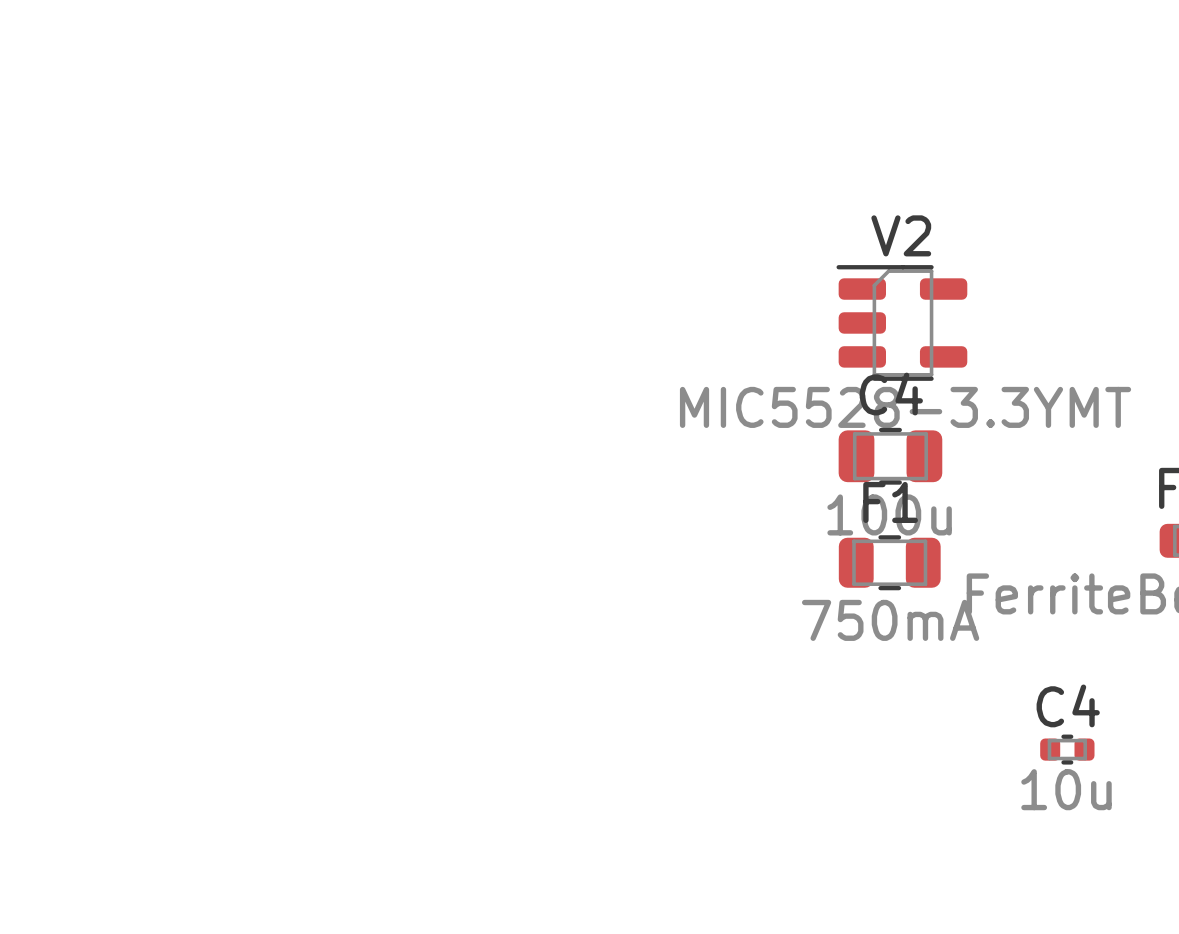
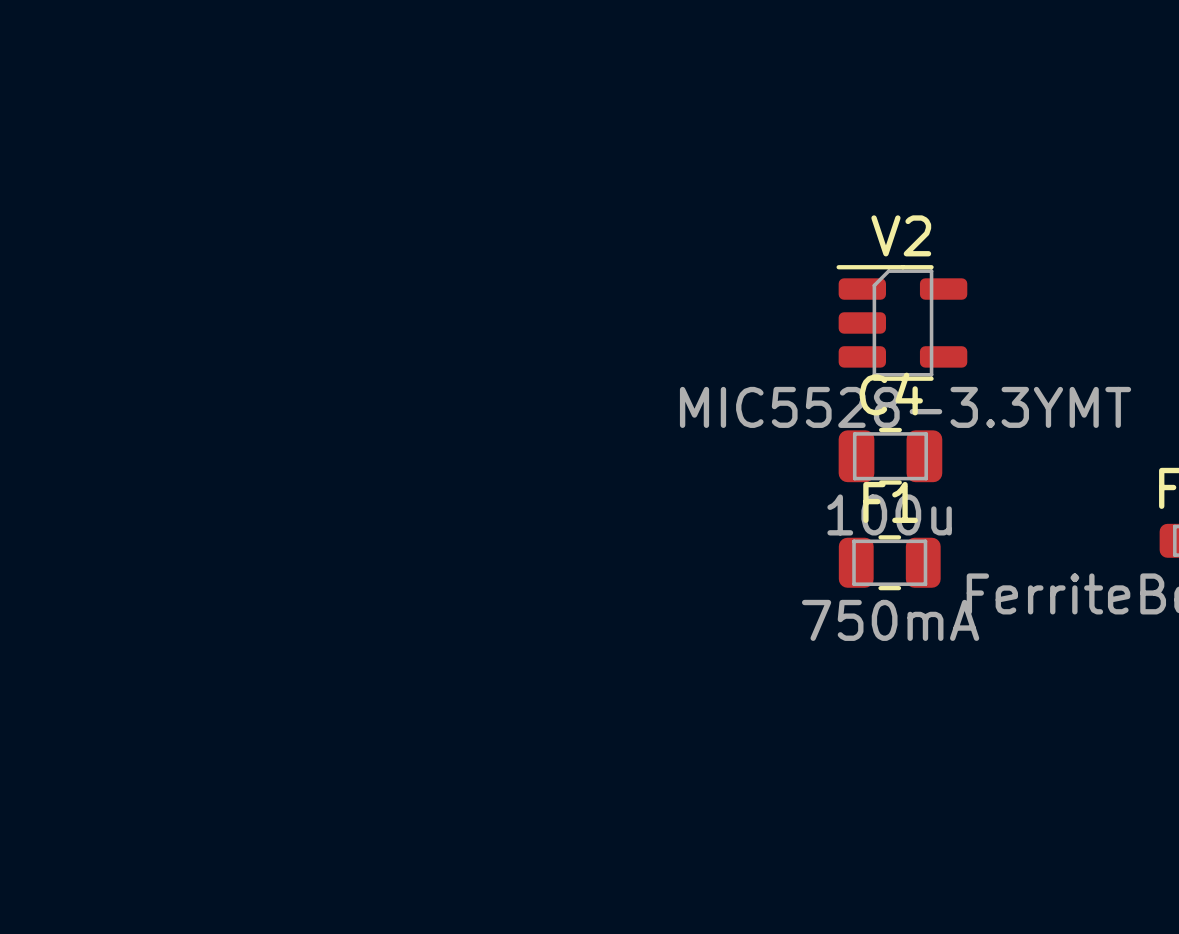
C4: 10u (1067, 749) -> none

